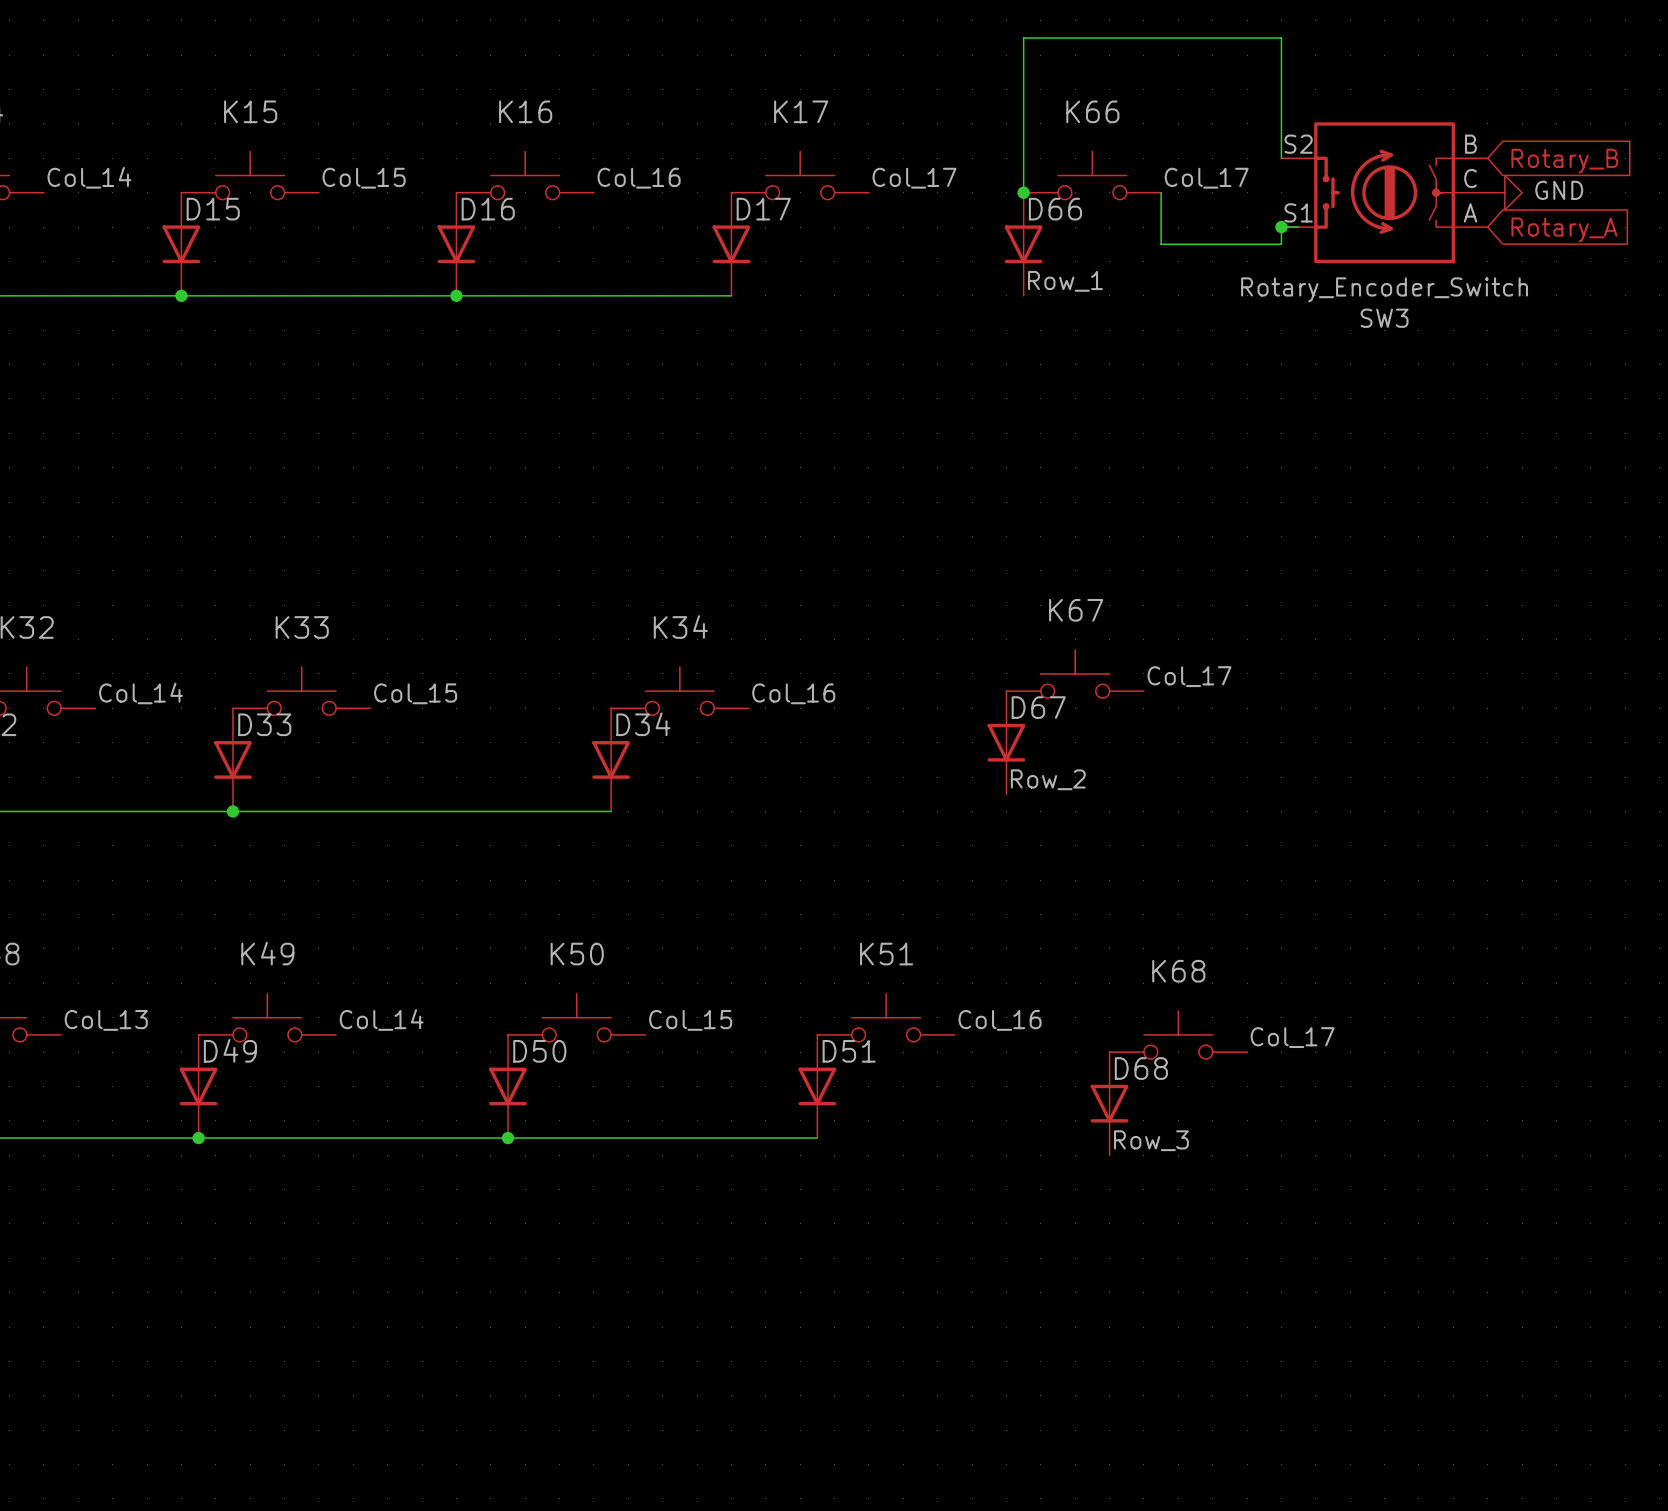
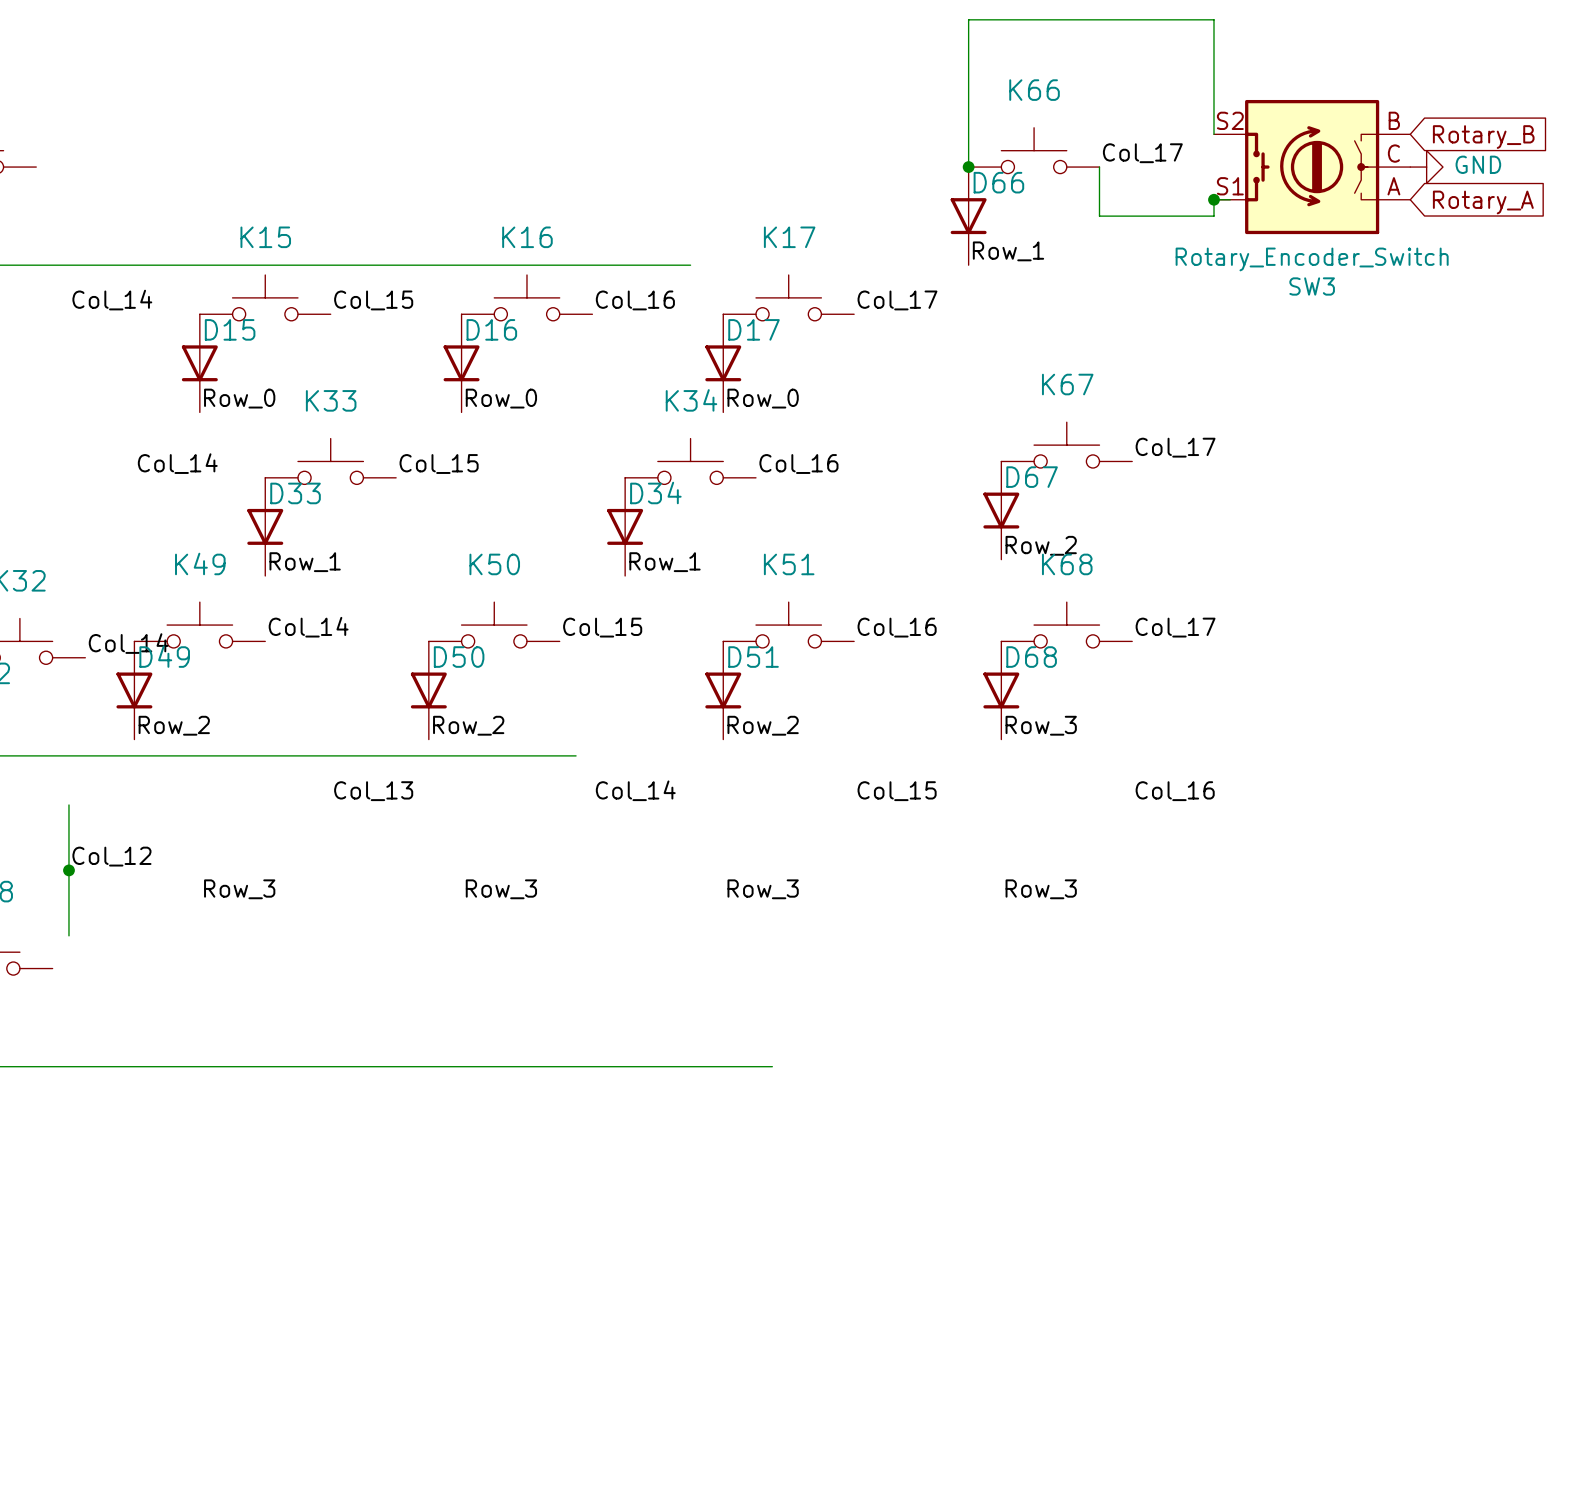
K15 position: (250, 175) -> (265, 297)
K16 position: (525, 175) -> (526, 297)
K17 position: (800, 175) -> (788, 297)
label position: Col_14 (89, 177) -> Col_14 (112, 300)
label position: Col_15 (364, 178) -> Col_15 (373, 300)
label position: Col_16 (639, 178) -> Col_16 (635, 300)
label position: Col_17 (914, 178) -> Col_17 (897, 300)
D15 position: (181, 244) -> (199, 363)
D16 position: (456, 244) -> (461, 363)
D17 position: (731, 244) -> (723, 363)
junction: (181, 295) -> none
junction: (456, 295) -> none
label: none -> Row_0 (239, 398)
label: none -> Row_0 (501, 398)
label: none -> Row_0 (763, 398)
label: none -> Col_17 (1175, 447)
label: none -> Col_14 (177, 463)
label: none -> Col_15 (439, 464)
label: none -> Col_16 (798, 464)
label: none -> Row_2 (1041, 545)
label: none -> Row_1 (305, 562)
label: none -> Row_1 (664, 562)
K67 position: (1075, 673) -> (1066, 445)
label: none -> Col_15 (602, 627)
label: none -> Col_16 (897, 627)
label position: Col_17 (1189, 676) -> Col_17 (1175, 627)
K33 position: (301, 691) -> (330, 461)
K34 position: (679, 691) -> (690, 461)
label: Col_15 (415, 693) -> Col_14 (308, 627)
label: Col_16 (793, 693) -> none
D67 position: (1006, 742) -> (1001, 510)
D33 position: (232, 759) -> (265, 526)
D34 position: (611, 759) -> (625, 526)
label: none -> Row_2 (174, 725)
label: none -> Row_2 (468, 725)
label: none -> Row_2 (763, 725)
label: Row_2 (1048, 779) -> Row_3 (1041, 725)
junction: (232, 811) -> none
label: none -> Col_13 (373, 791)
label: none -> Col_14 (635, 790)
label: none -> Col_15 (897, 791)
label: none -> Col_16 (1175, 791)
wire: none -> (68, 804) (68, 935)
label: none -> Col_12 (111, 856)
junction: none -> (68, 870)
label: none -> Row_3 (239, 889)
label: none -> Row_3 (501, 889)
label: none -> Row_3 (763, 889)
label: none -> Row_3 (1041, 889)
K49 position: (267, 1017) -> (199, 625)
K50 position: (576, 1017) -> (494, 625)
K51 position: (886, 1017) -> (788, 625)
label: Col_14 (381, 1019) -> none
label: Col_13 (106, 1020) -> none
label: Col_15 (690, 1020) -> none
label: Col_16 (1000, 1020) -> none
K68 position: (1178, 1034) -> (1066, 625)
label: Col_17 (1292, 1037) -> none
D49 position: (198, 1086) -> (134, 690)
D50 position: (507, 1086) -> (428, 690)
D51 position: (817, 1086) -> (723, 690)
D68 position: (1109, 1103) -> (1001, 690)
junction: (198, 1138) -> none
junction: (507, 1138) -> none
label: Row_3 (1151, 1140) -> none

